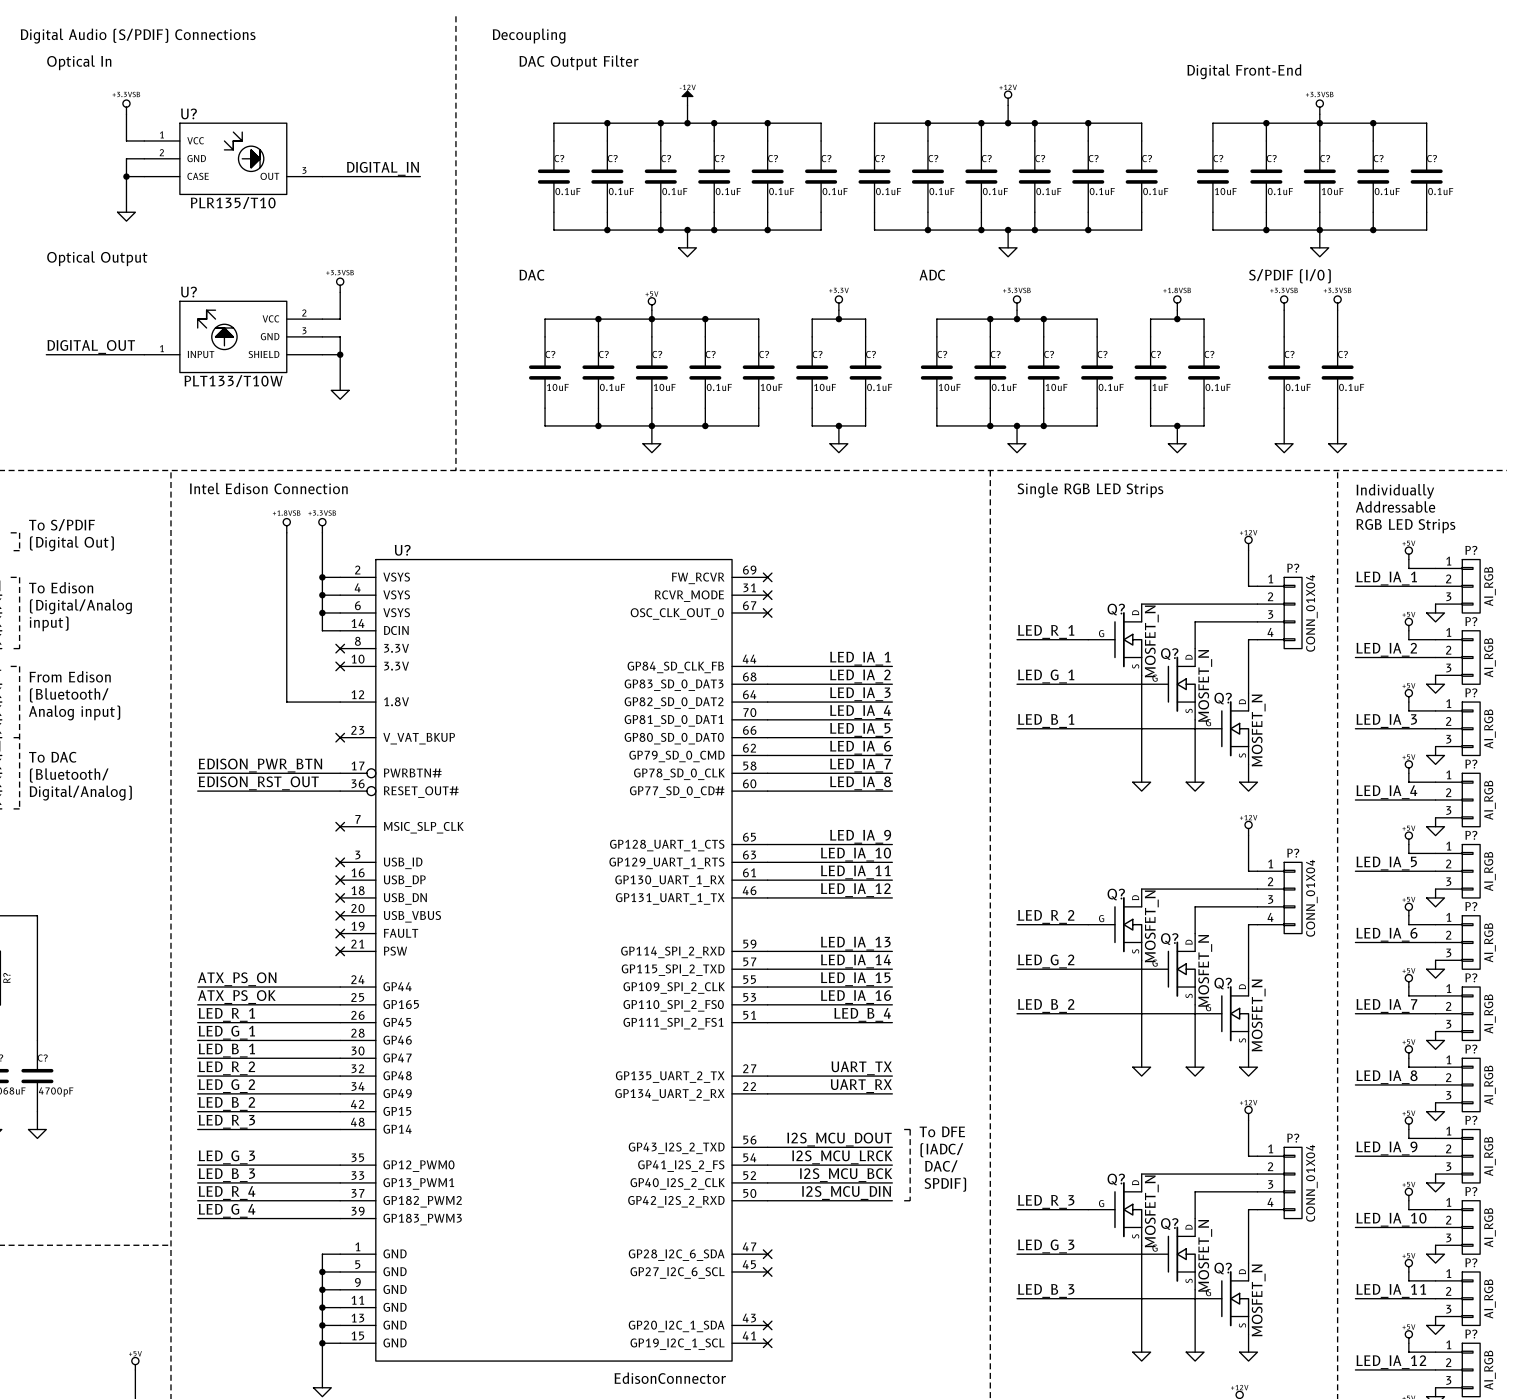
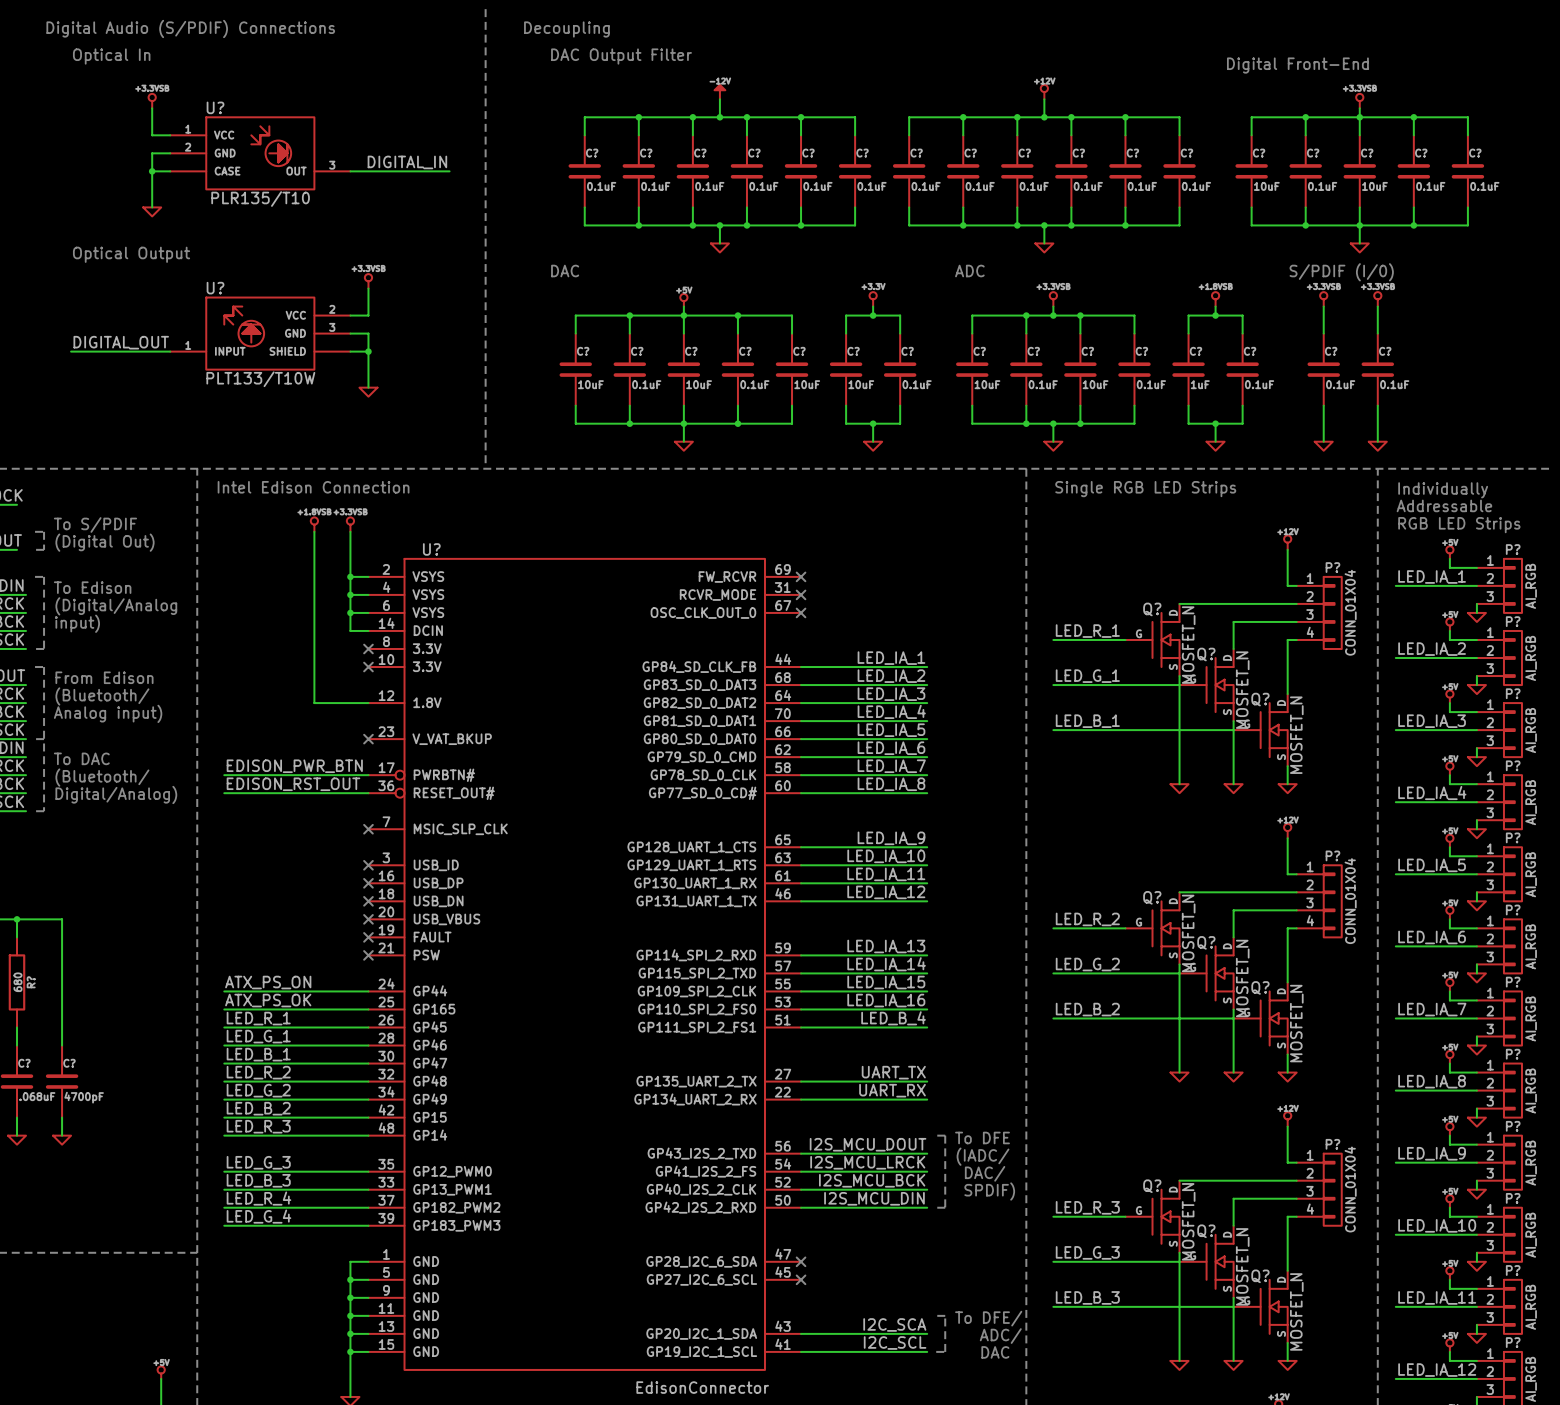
line: none -> (936, 1315) (945, 1315) (945, 1351) (936, 1351)
text: none -> To DFE/ (988, 1318)
label: none -> I2C_SCA (894, 1324)
wire: none -> (801, 1333) (927, 1333)
no-connect mark: (767, 1325) -> none
text: none -> ADC/ (1000, 1336)
label: none -> I2C_SCL (895, 1343)
wire: none -> (801, 1351) (927, 1351)
no-connect mark: (767, 1343) -> none
text: none -> DAC (995, 1352)

